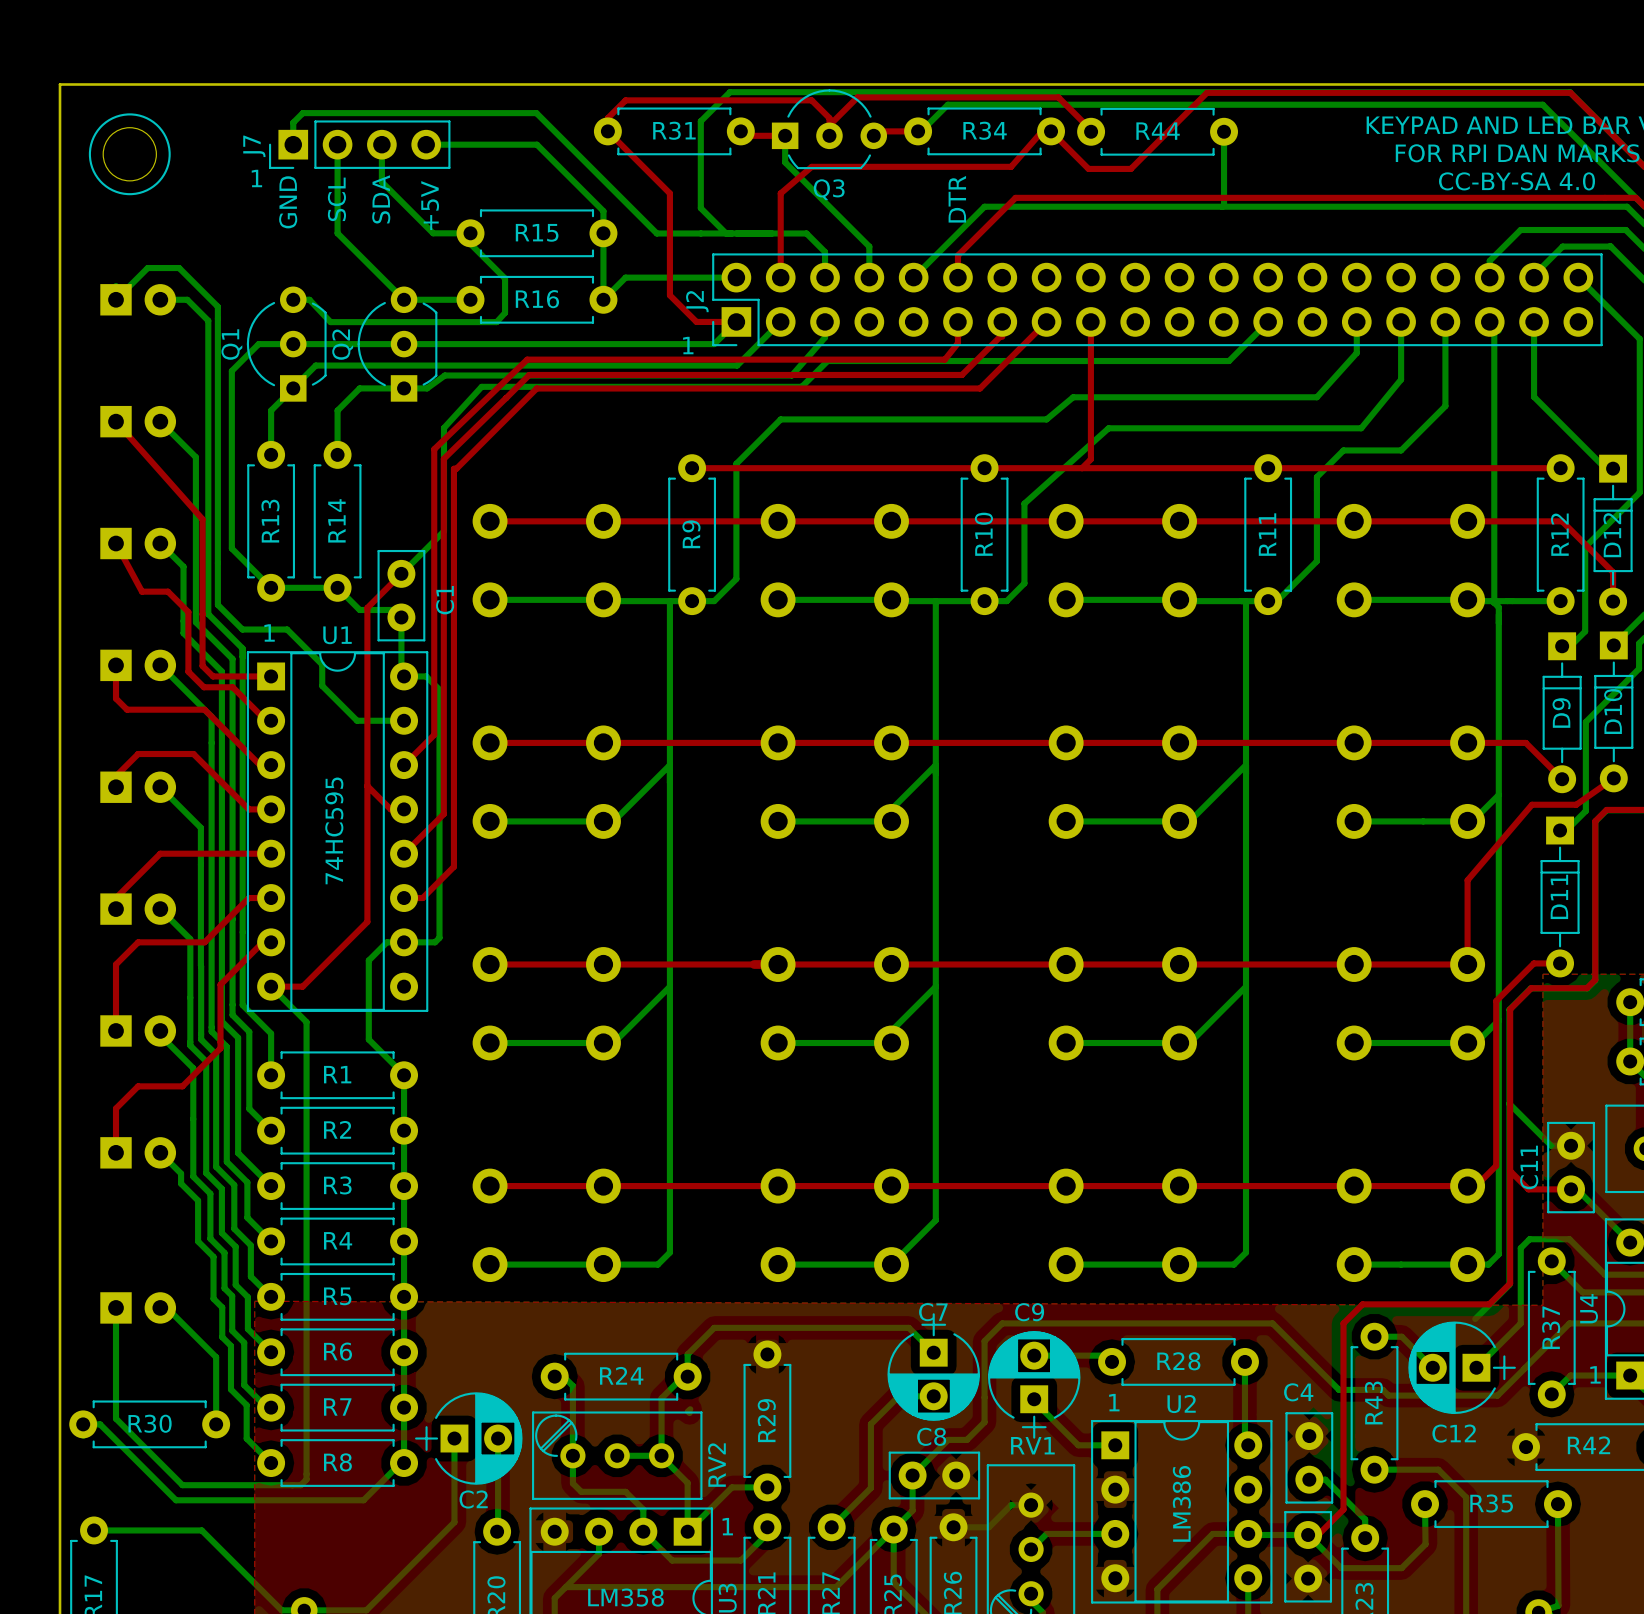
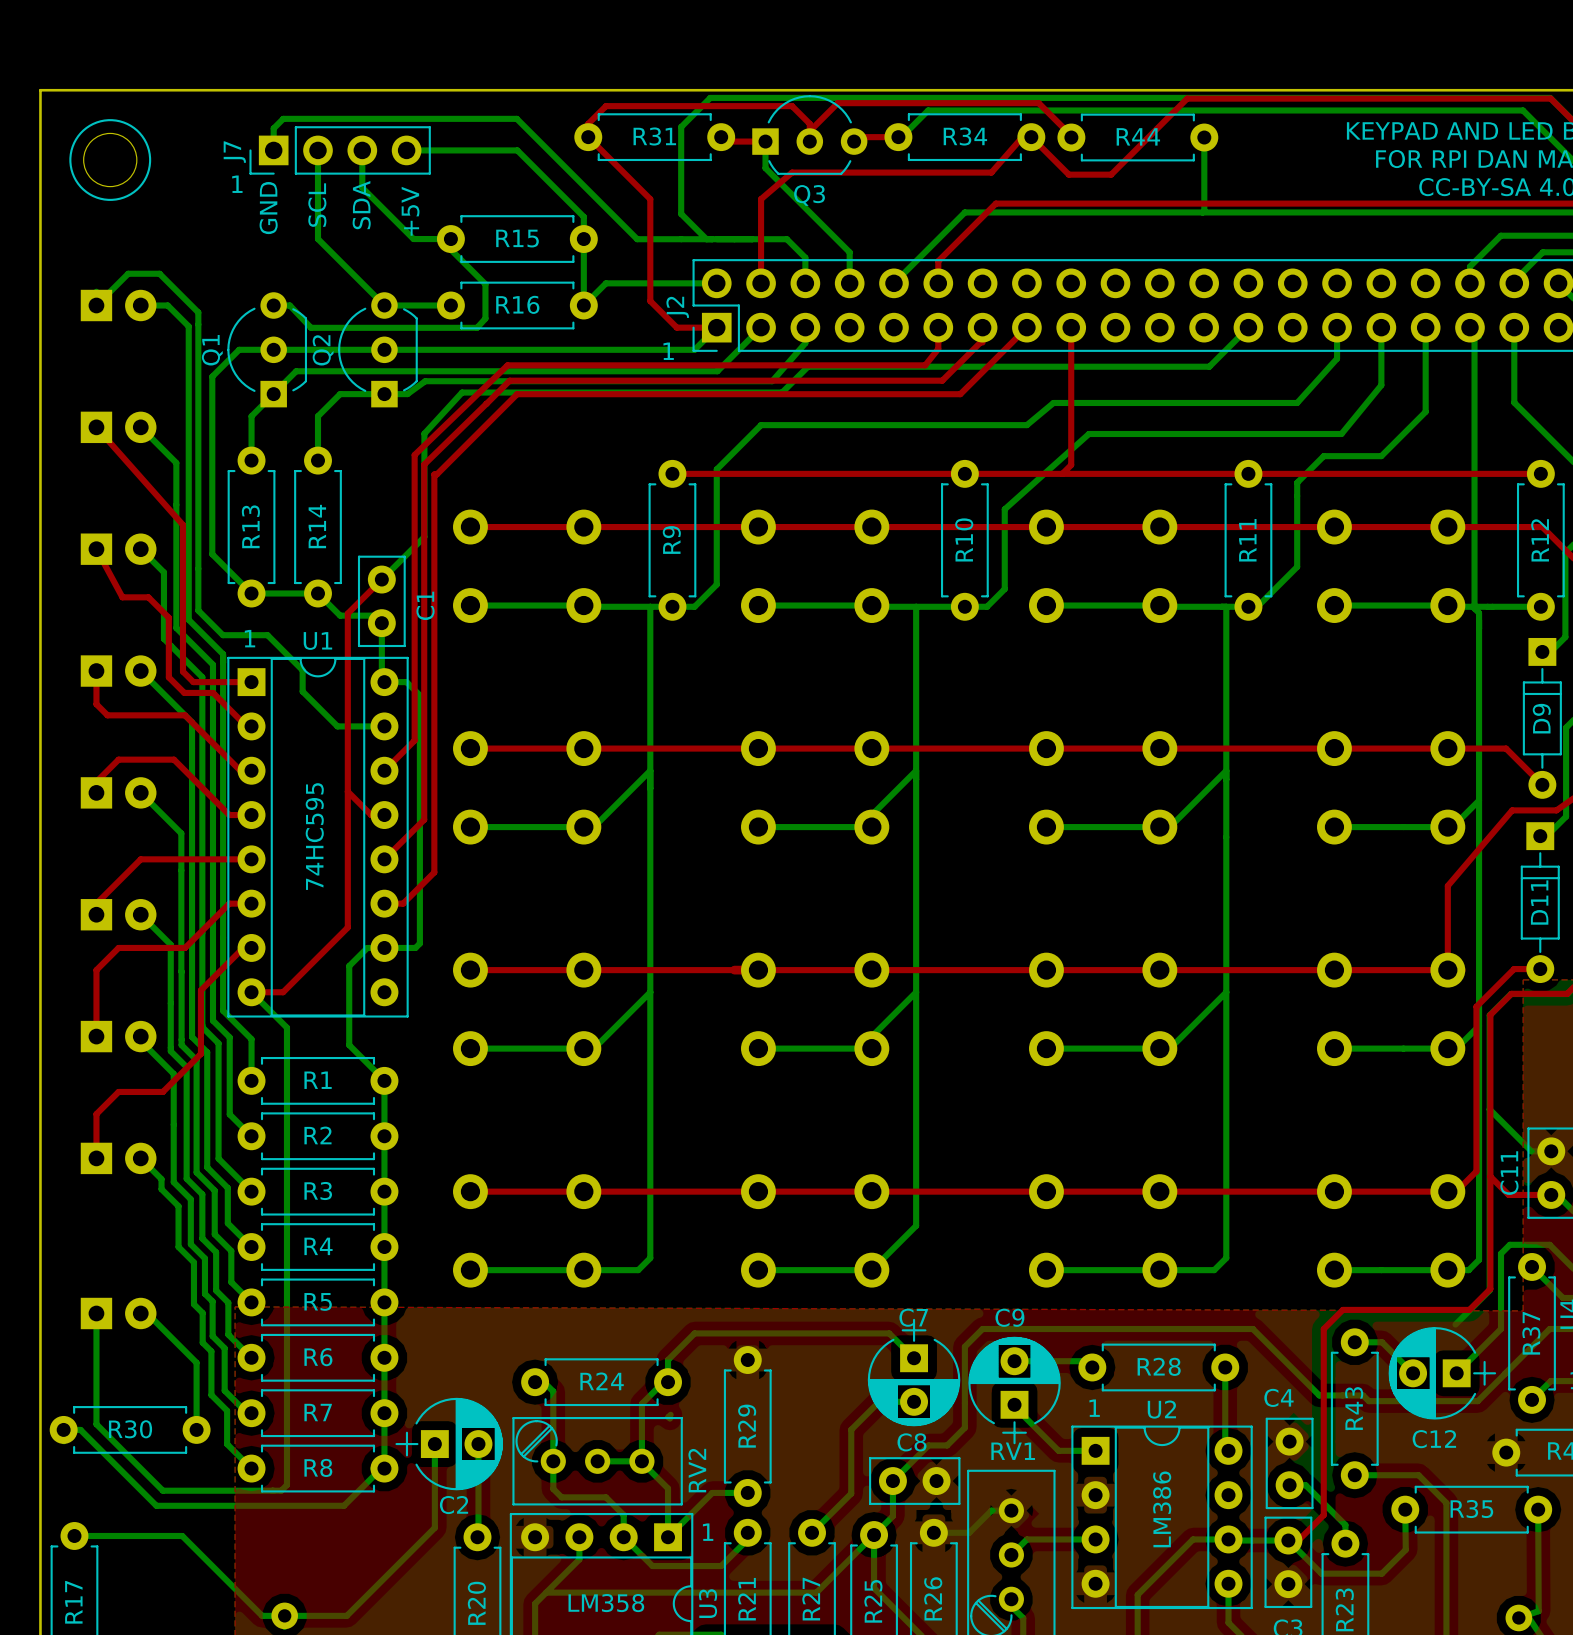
text: DTR (957, 199) -> none

